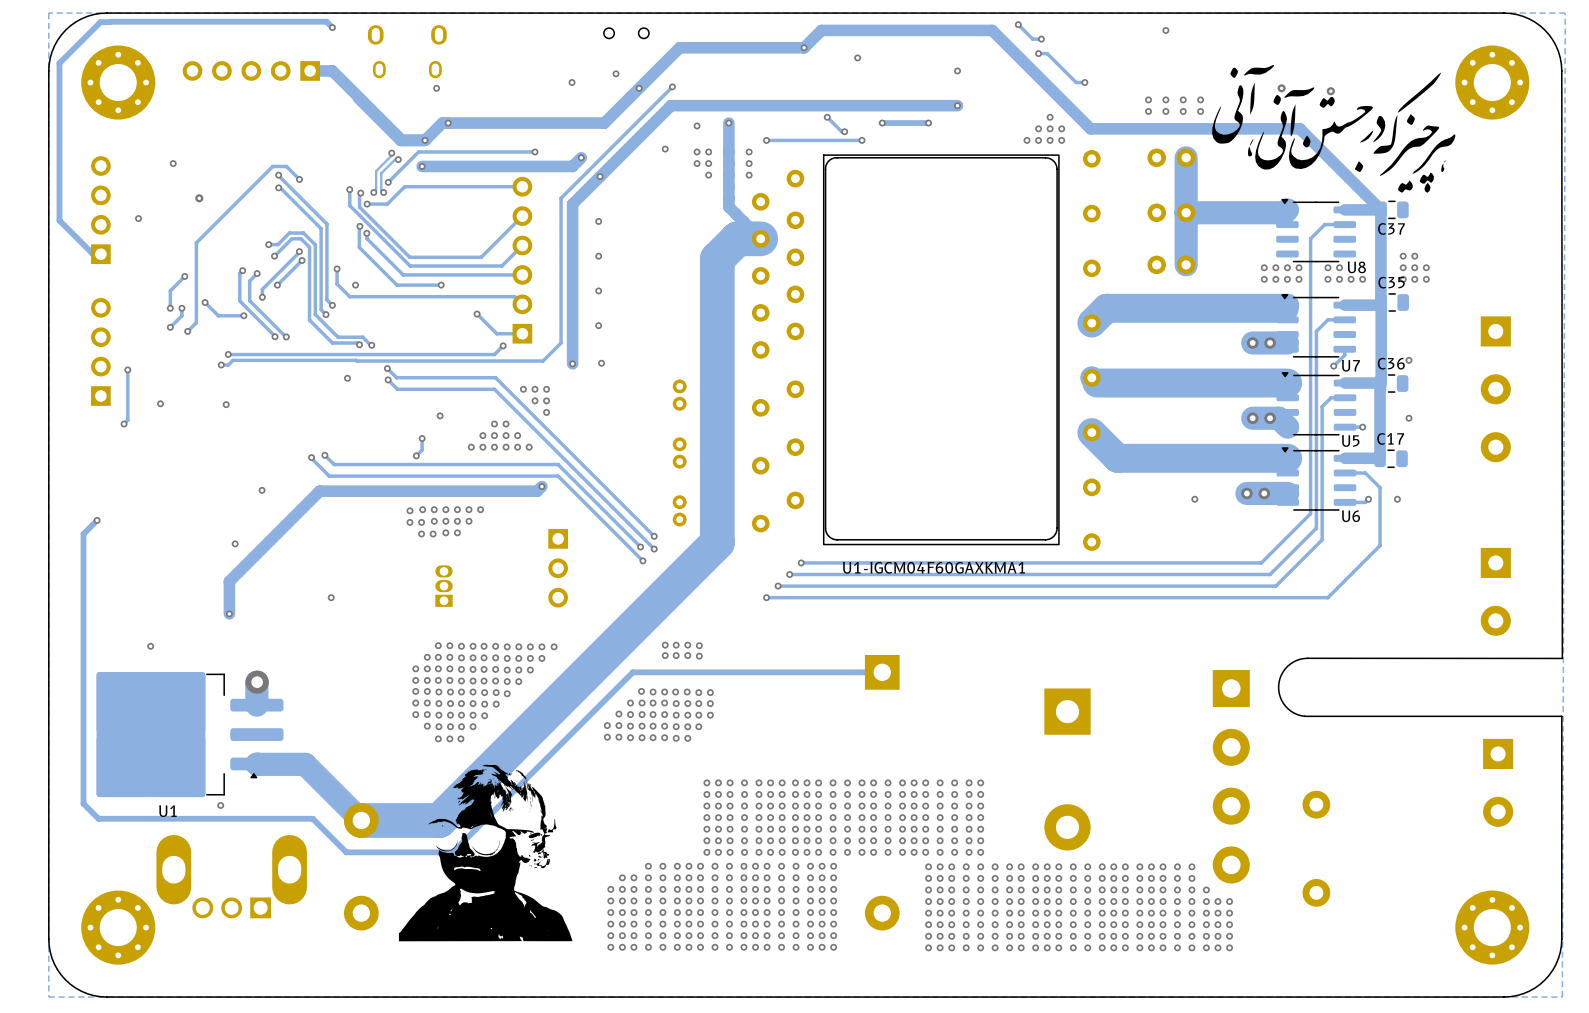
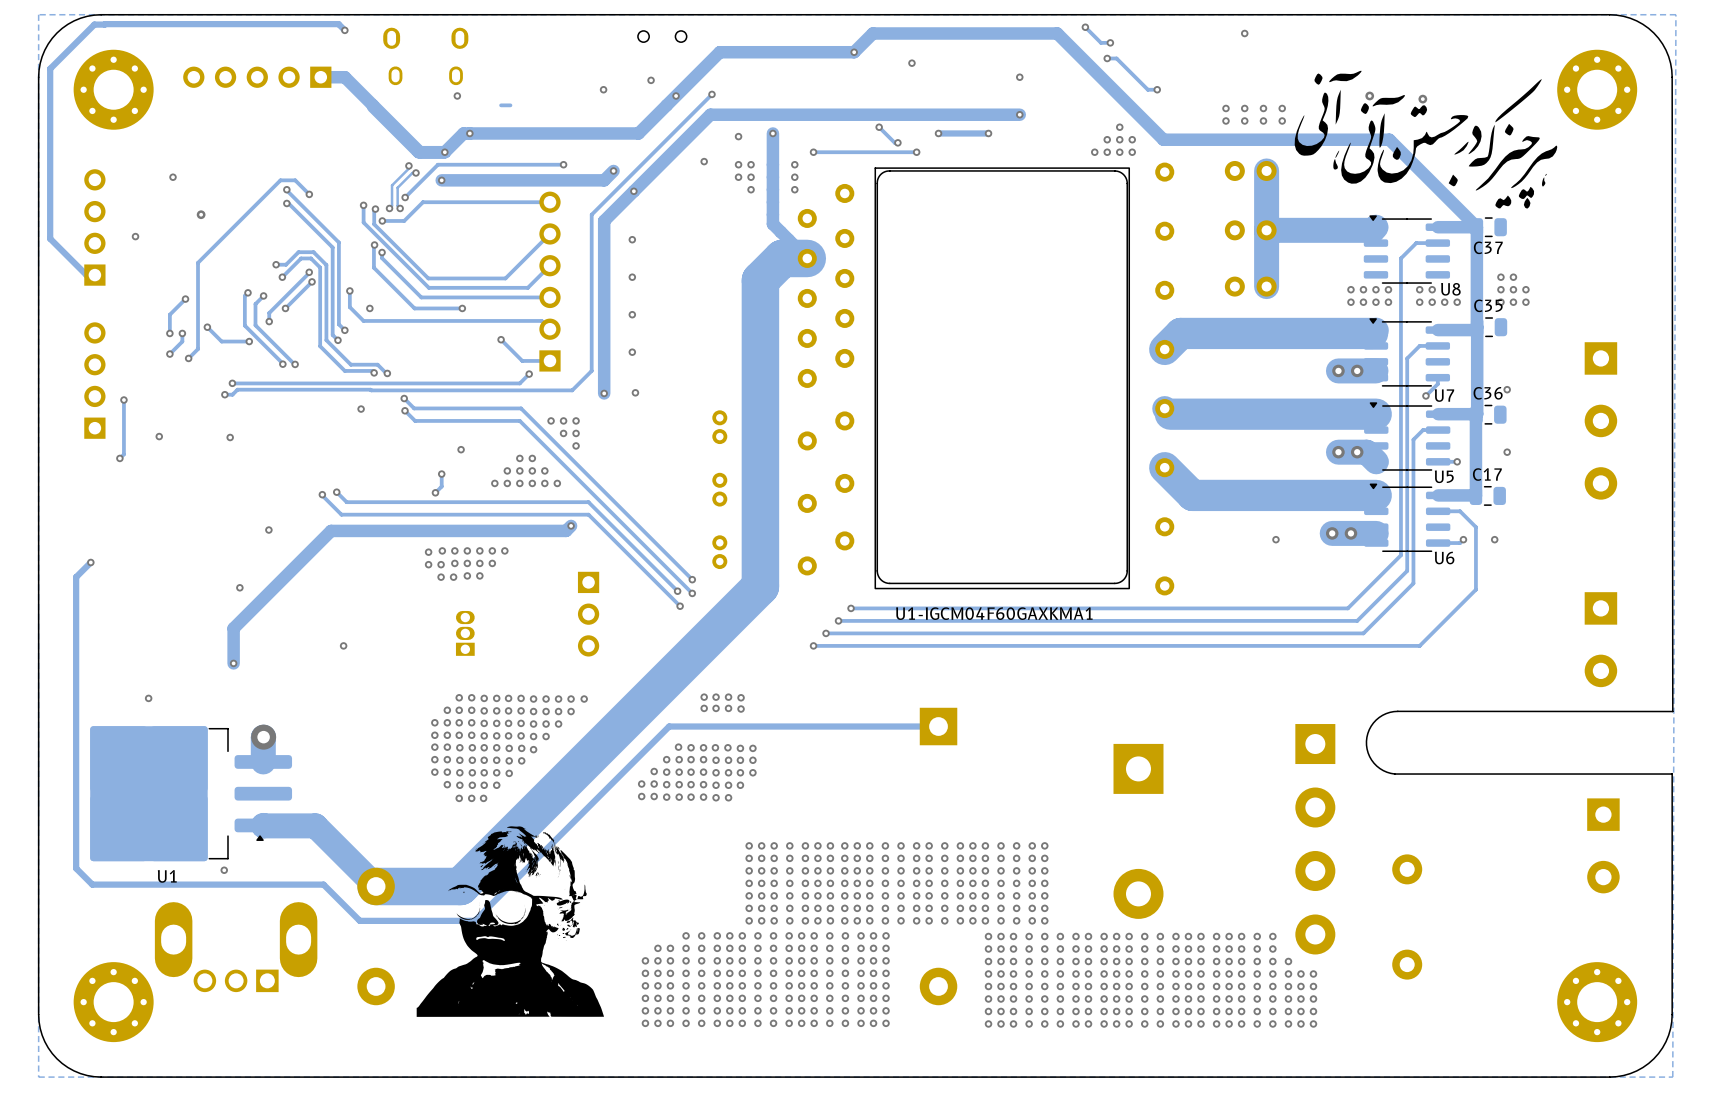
track: none -> (510, 105) (501, 105)

